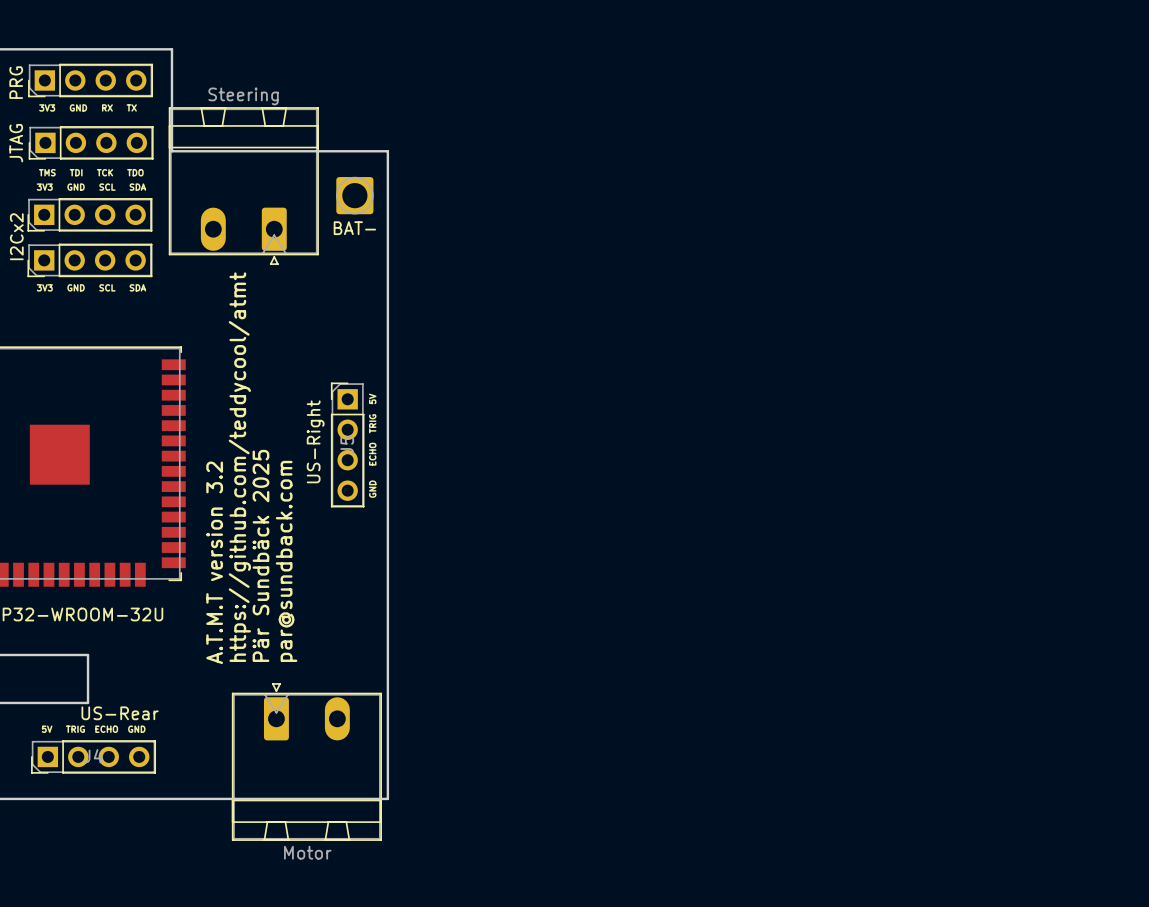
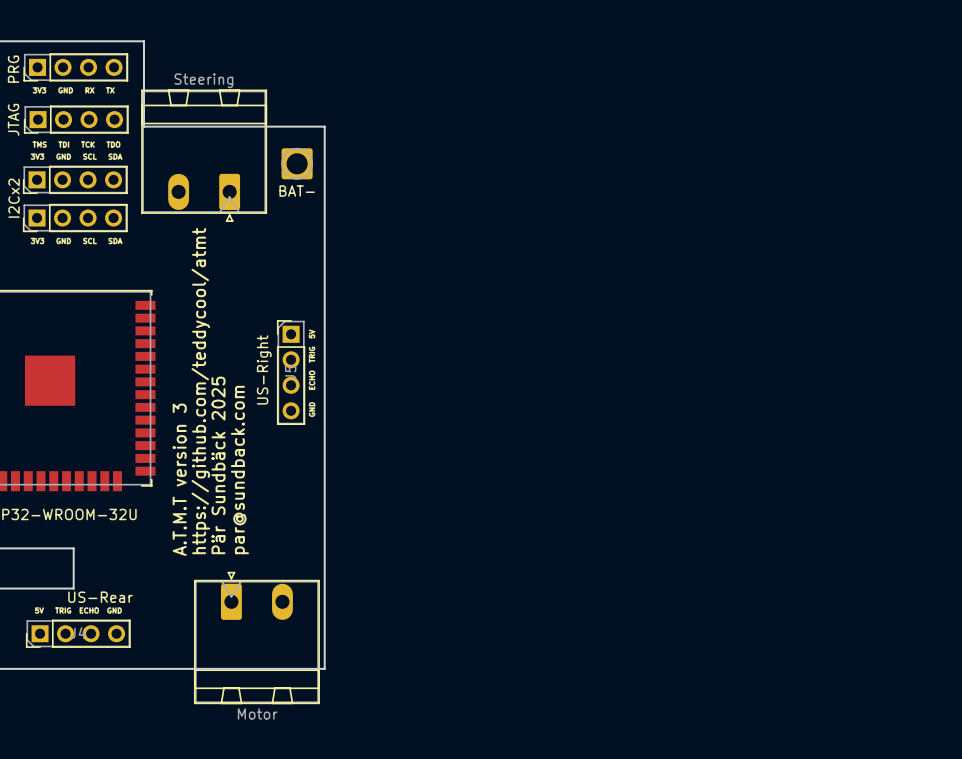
text: A.T.M.T version 3.2 (214, 562) -> A.T.M.T version 3 (179, 479)

